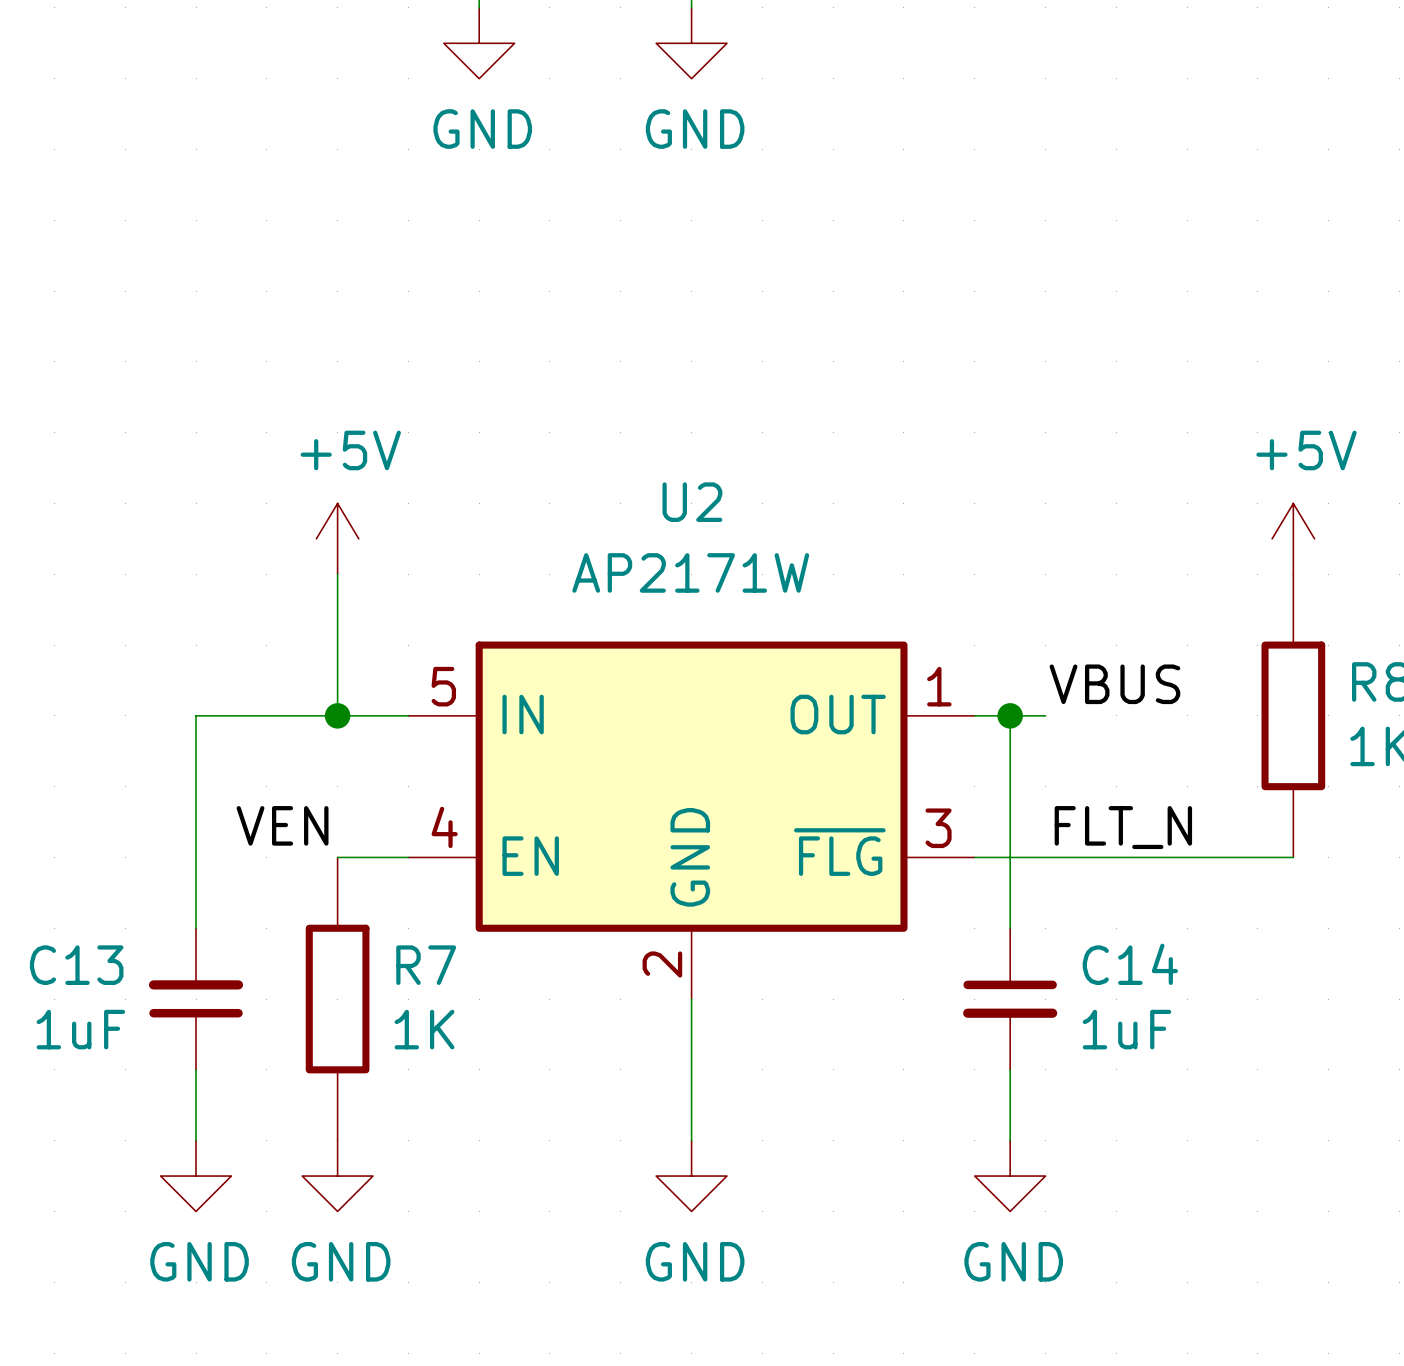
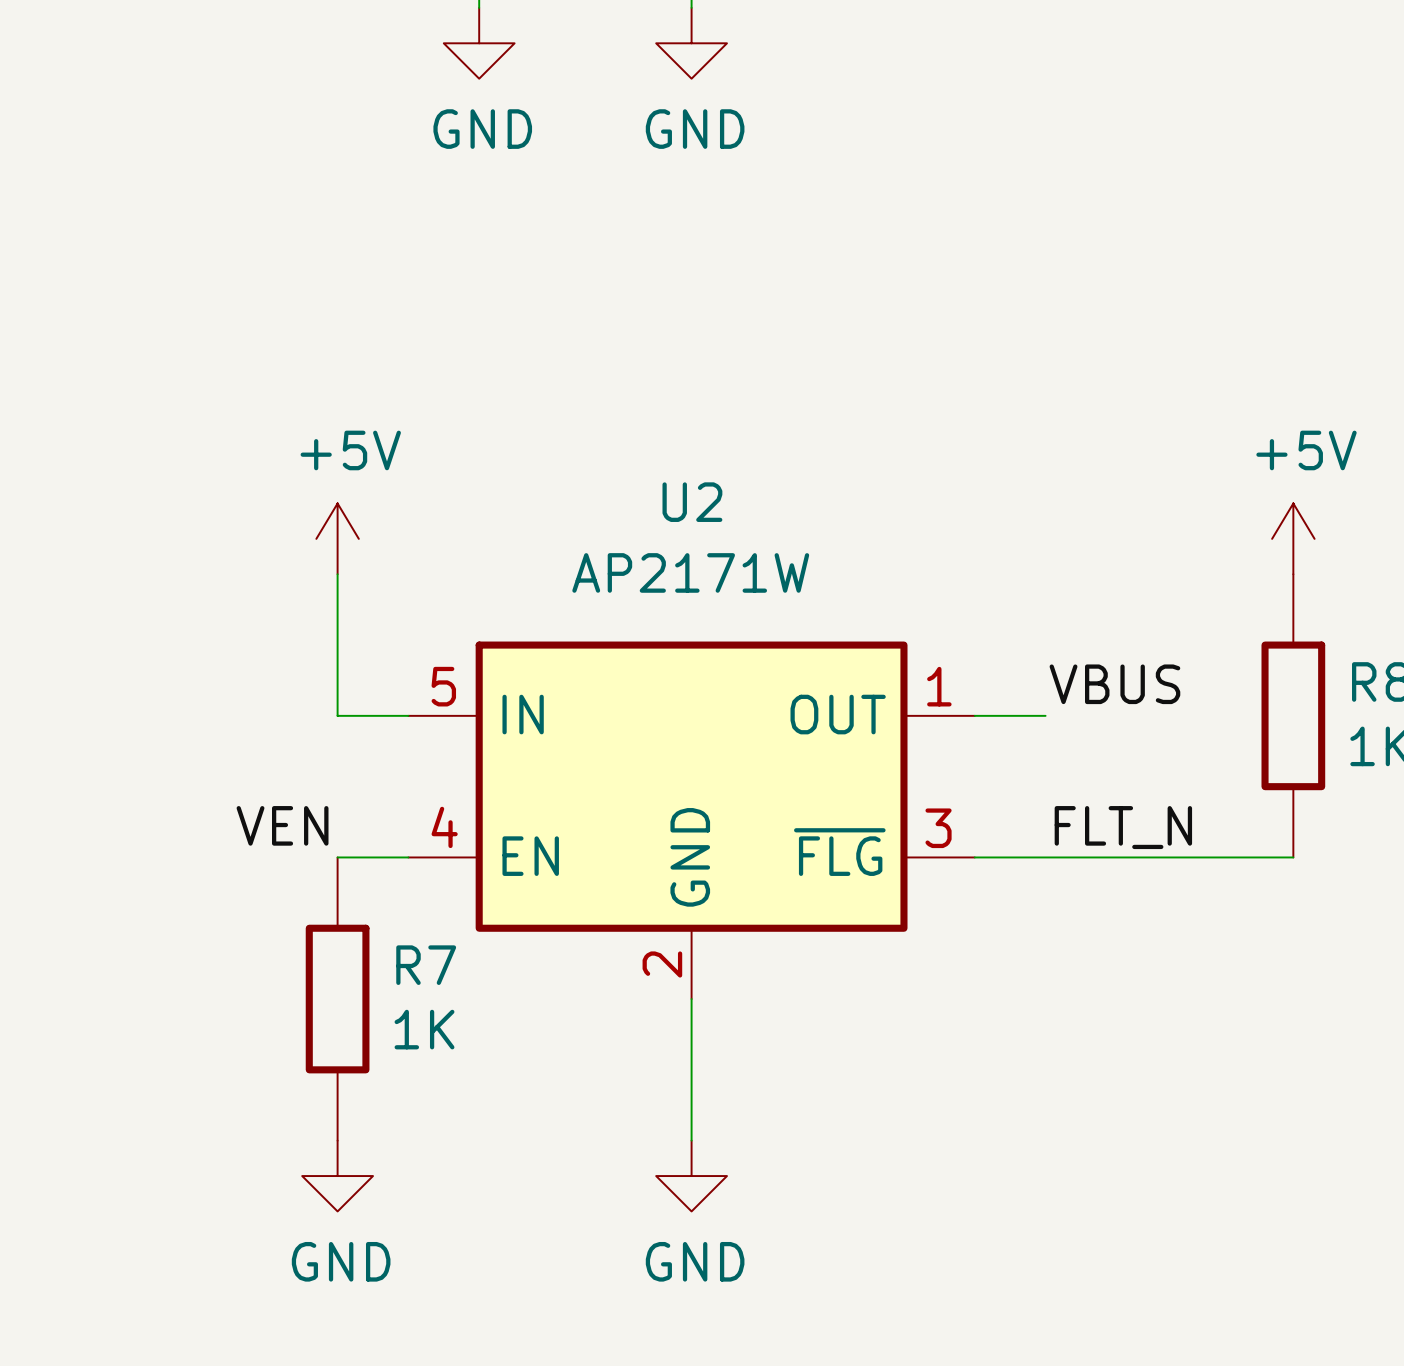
wire: (337, 715) (196, 715) (196, 928) -> none
junction: (337, 715) -> none
wire: (1010, 715) (1010, 928) -> none
junction: (1010, 715) -> none
C13: 1uF (196, 999) -> none
C14: 1uF (1010, 999) -> none
wire: (196, 1069) (196, 1140) -> none
wire: (1010, 1069) (1010, 1140) -> none
power symbol: GND (196, 1176) -> none
power symbol: GND (1010, 1176) -> none

